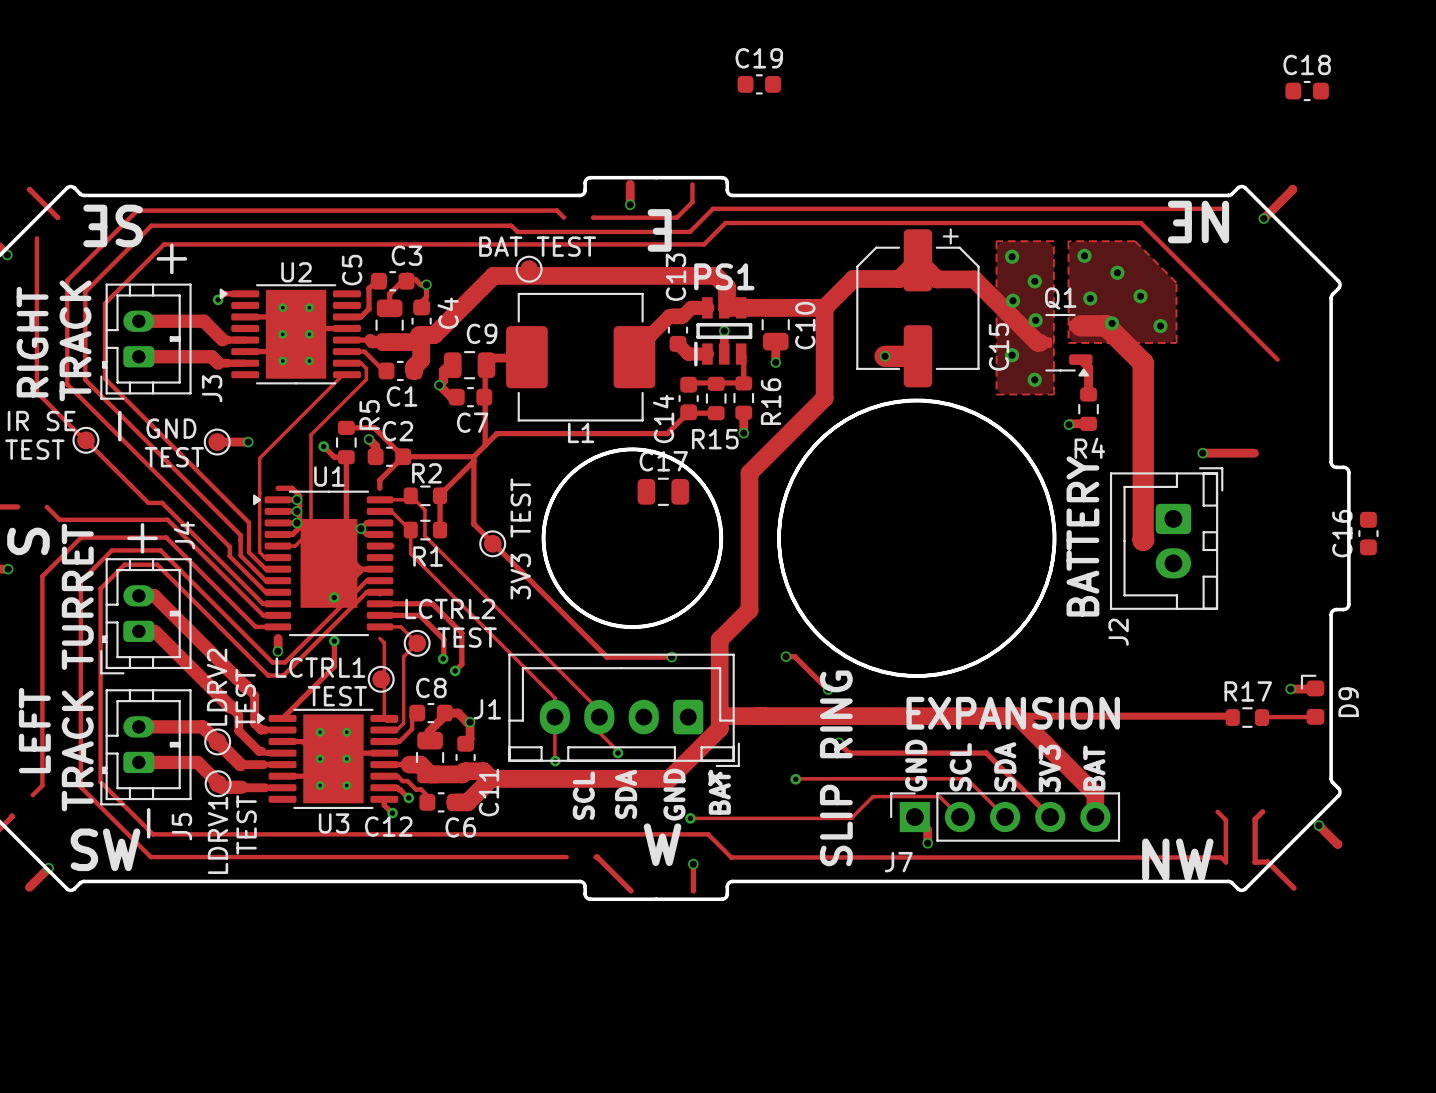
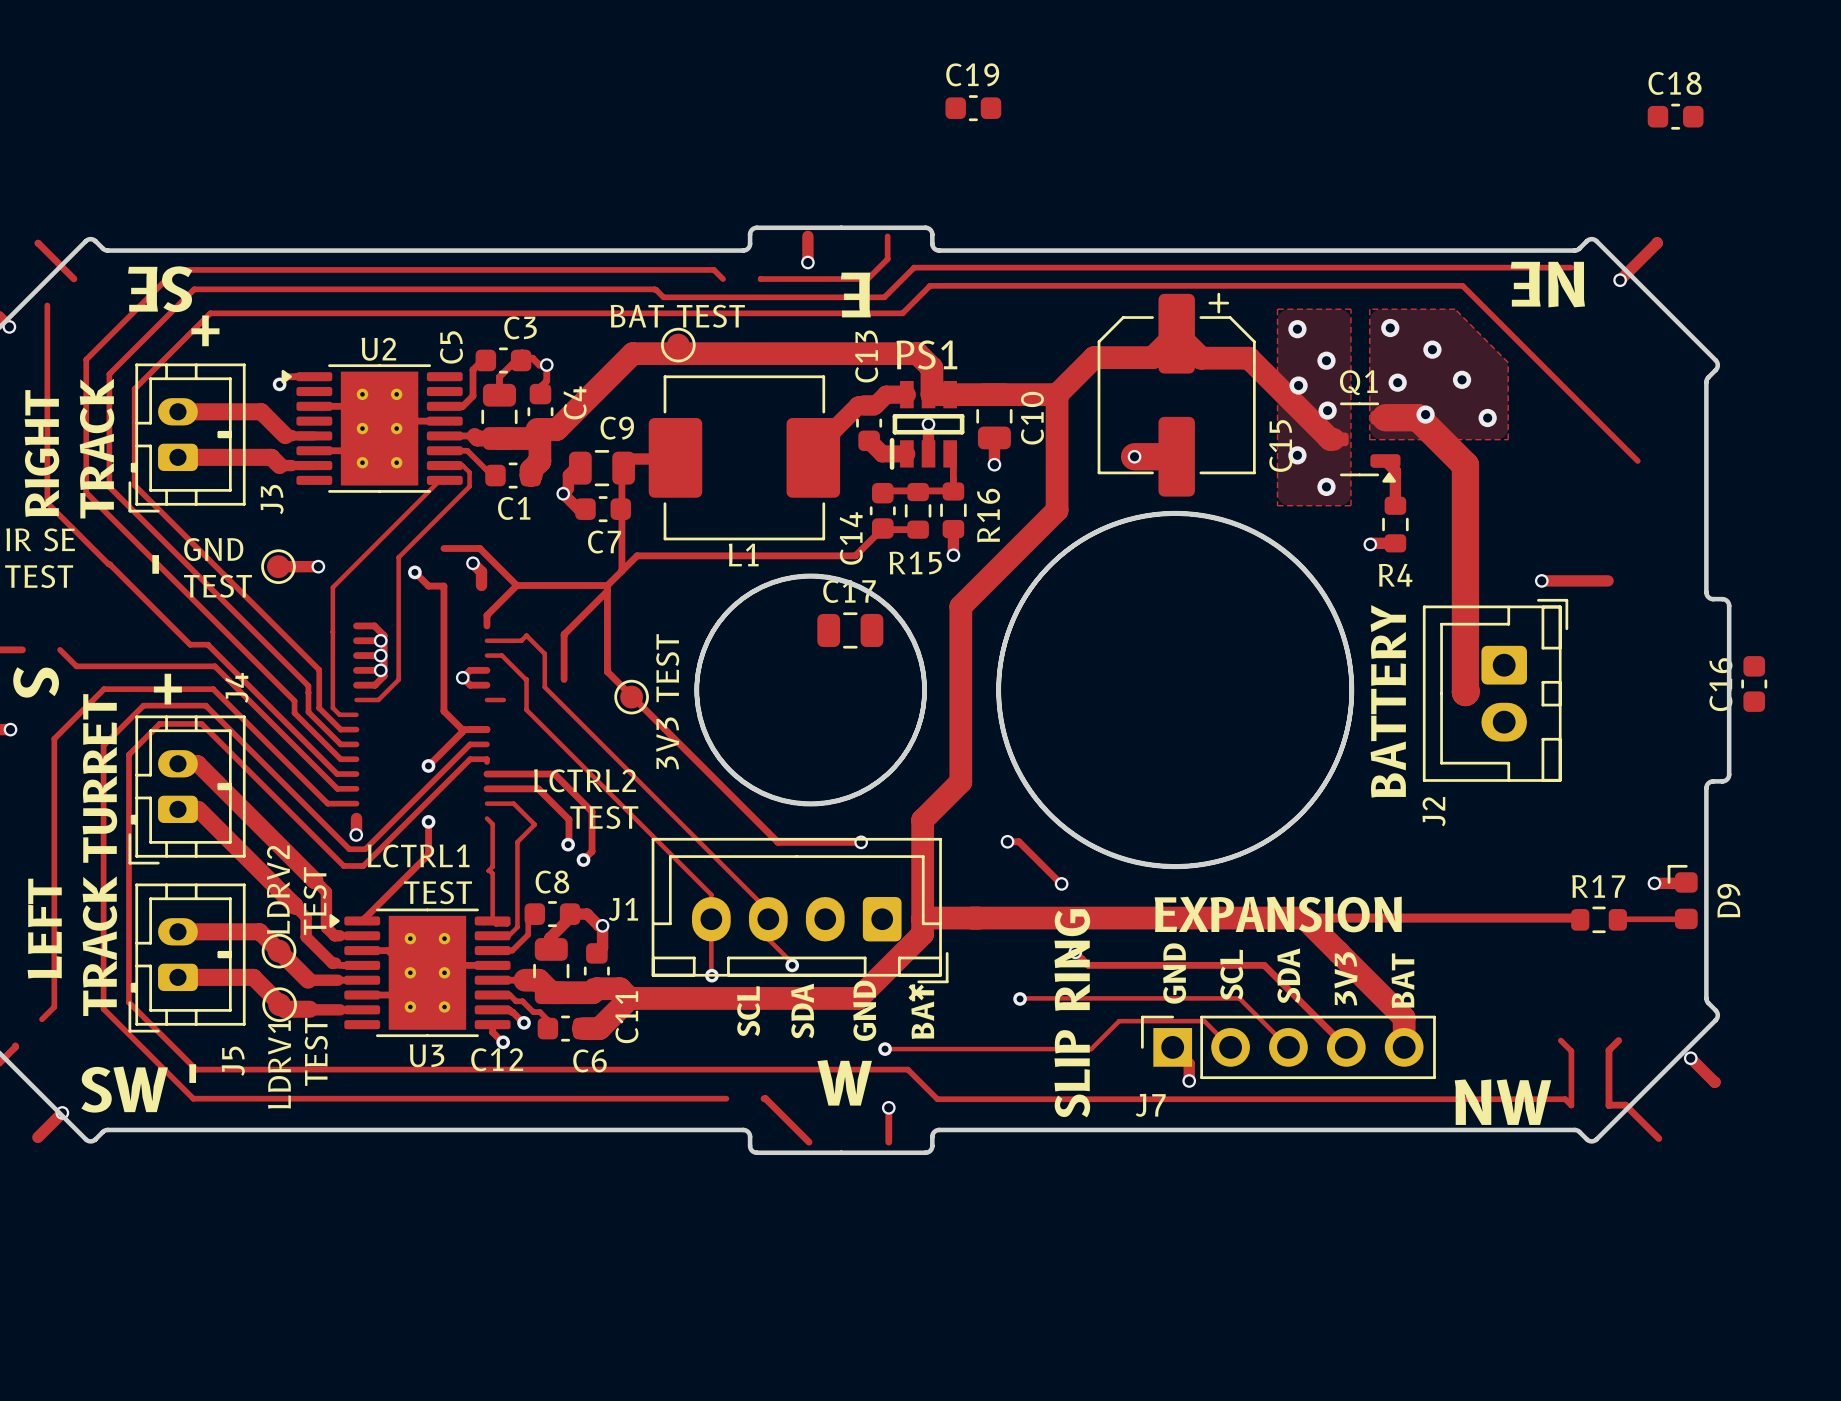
part: (85, 440) -> none
R5: (346, 442) -> none
C2: (389, 456) -> none
R2: (425, 495) -> none
R1: (425, 530) -> none
U1: (323, 563) -> none
part: (417, 643) -> none
part: (381, 679) -> none

